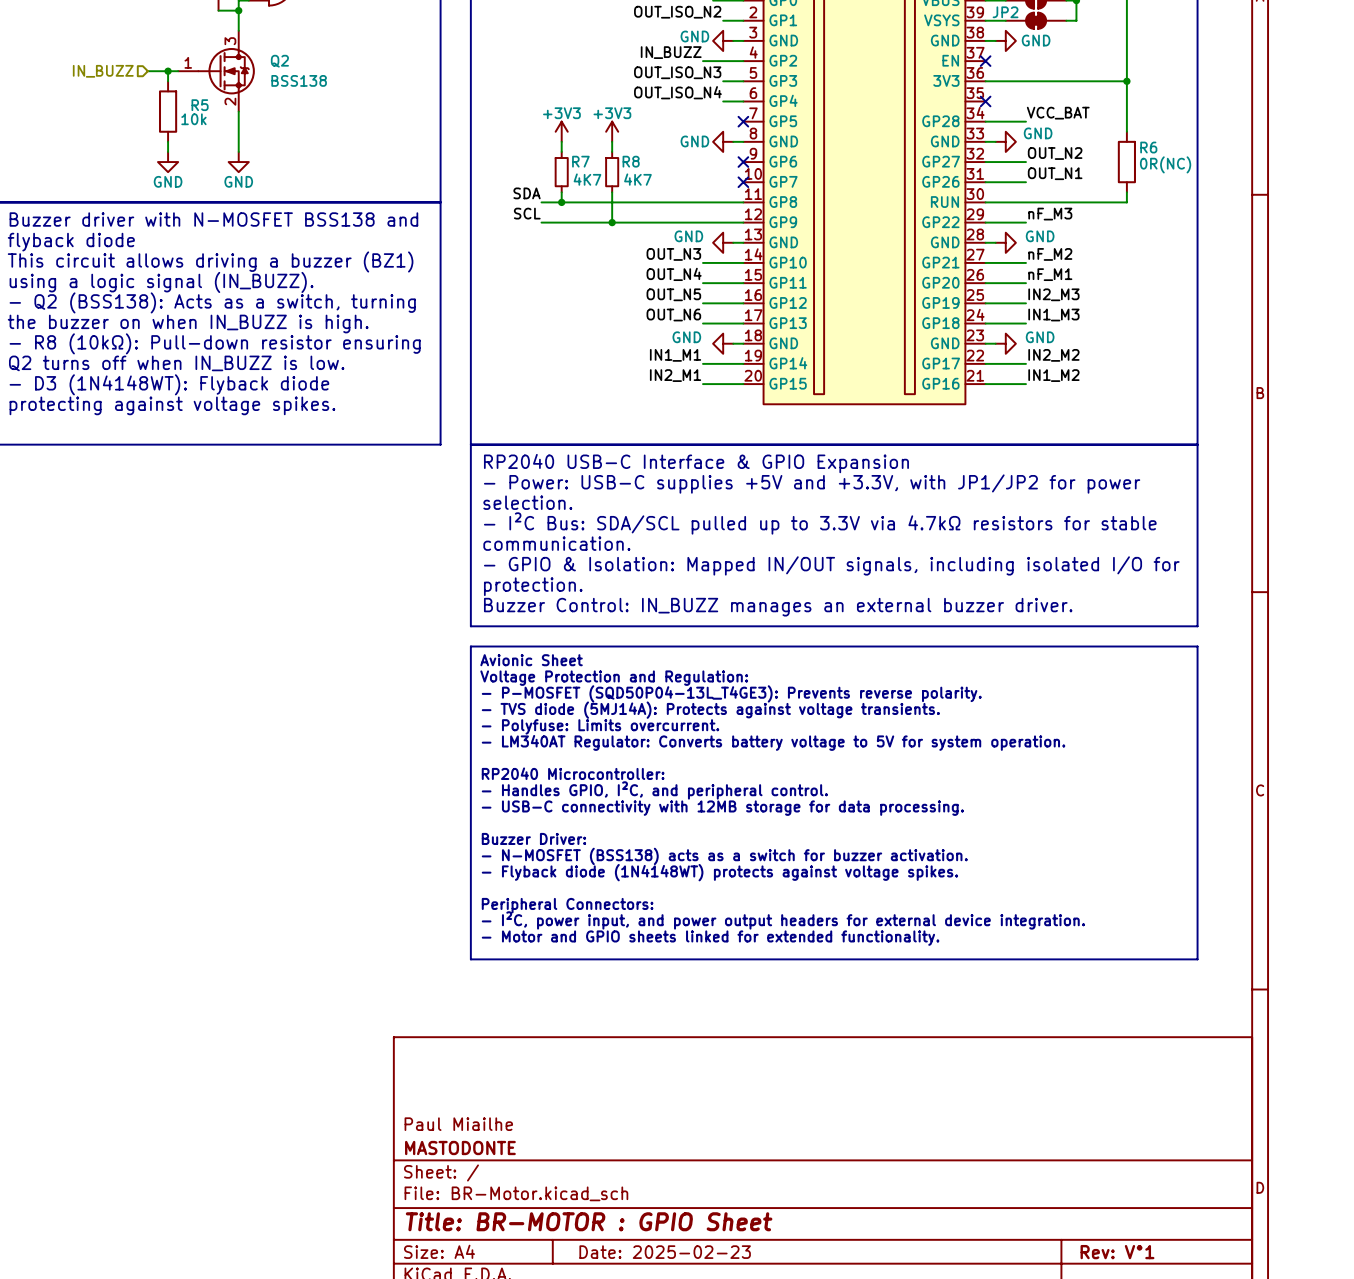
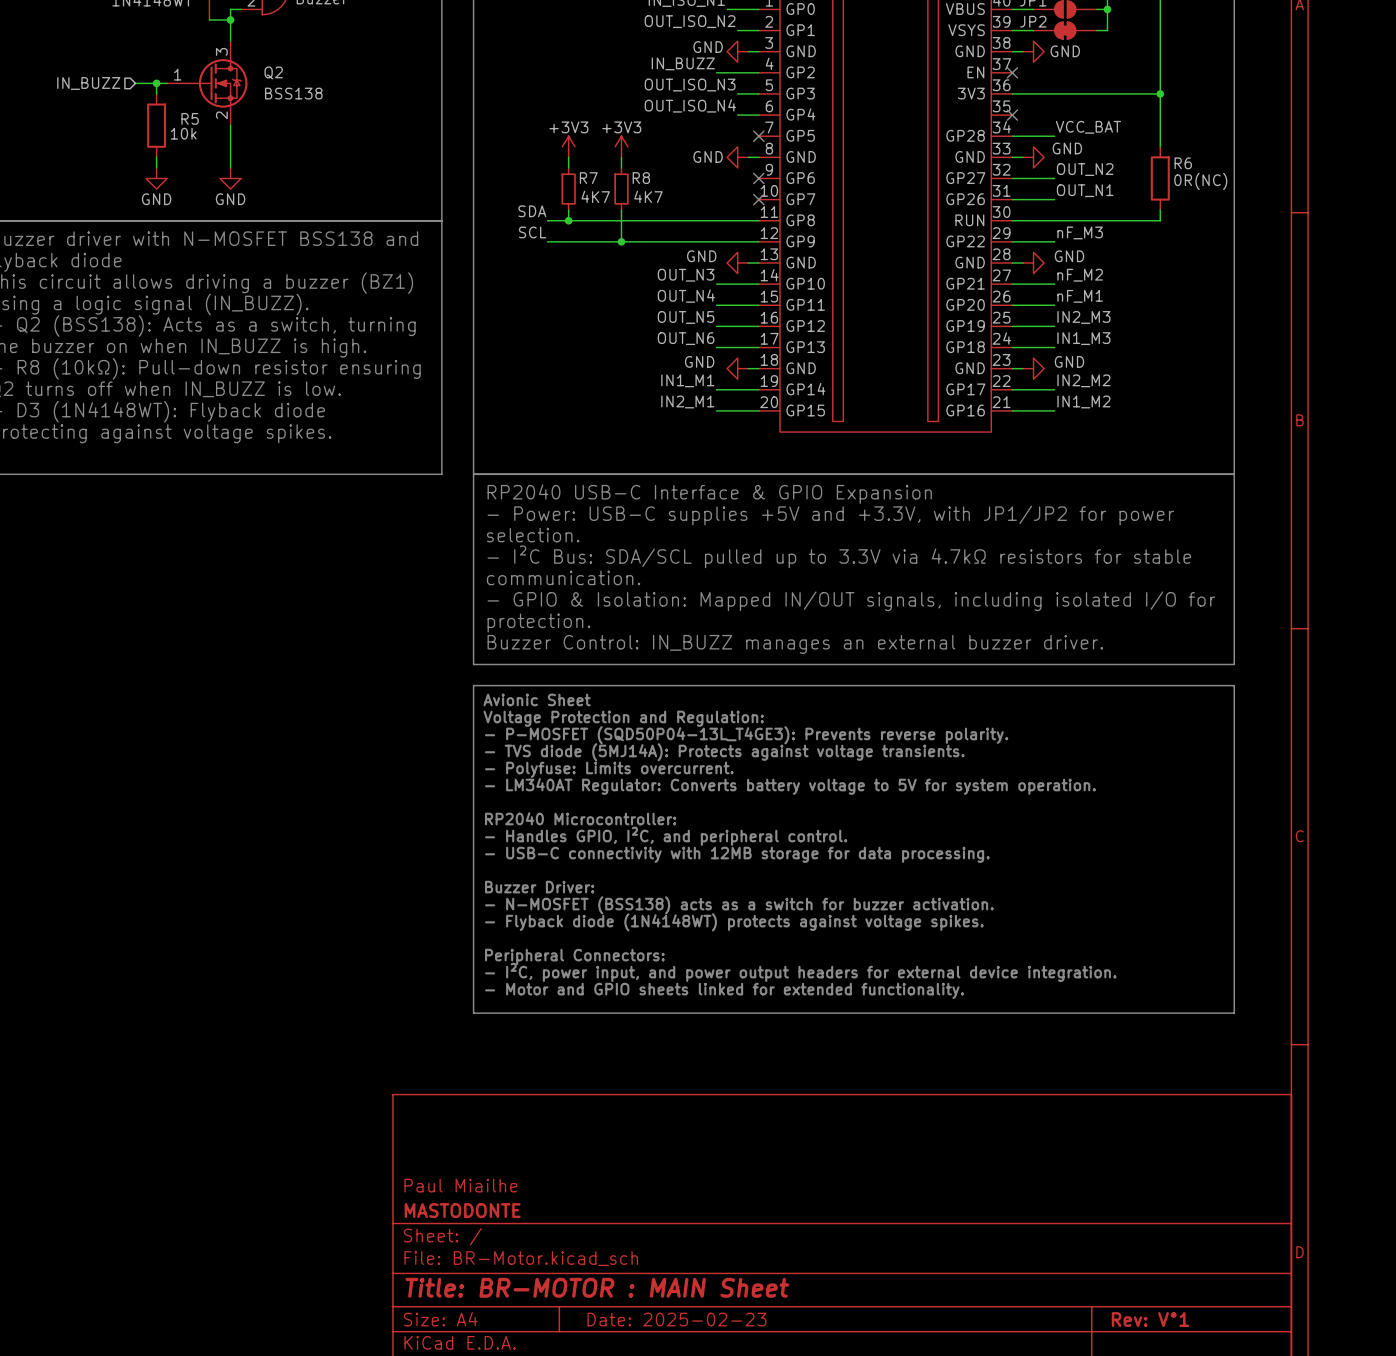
title block: Title: BR-MOTOR : GPIO Sheet (589, 1221) -> Title: BR-MOTOR : MAIN Sheet (597, 1287)

